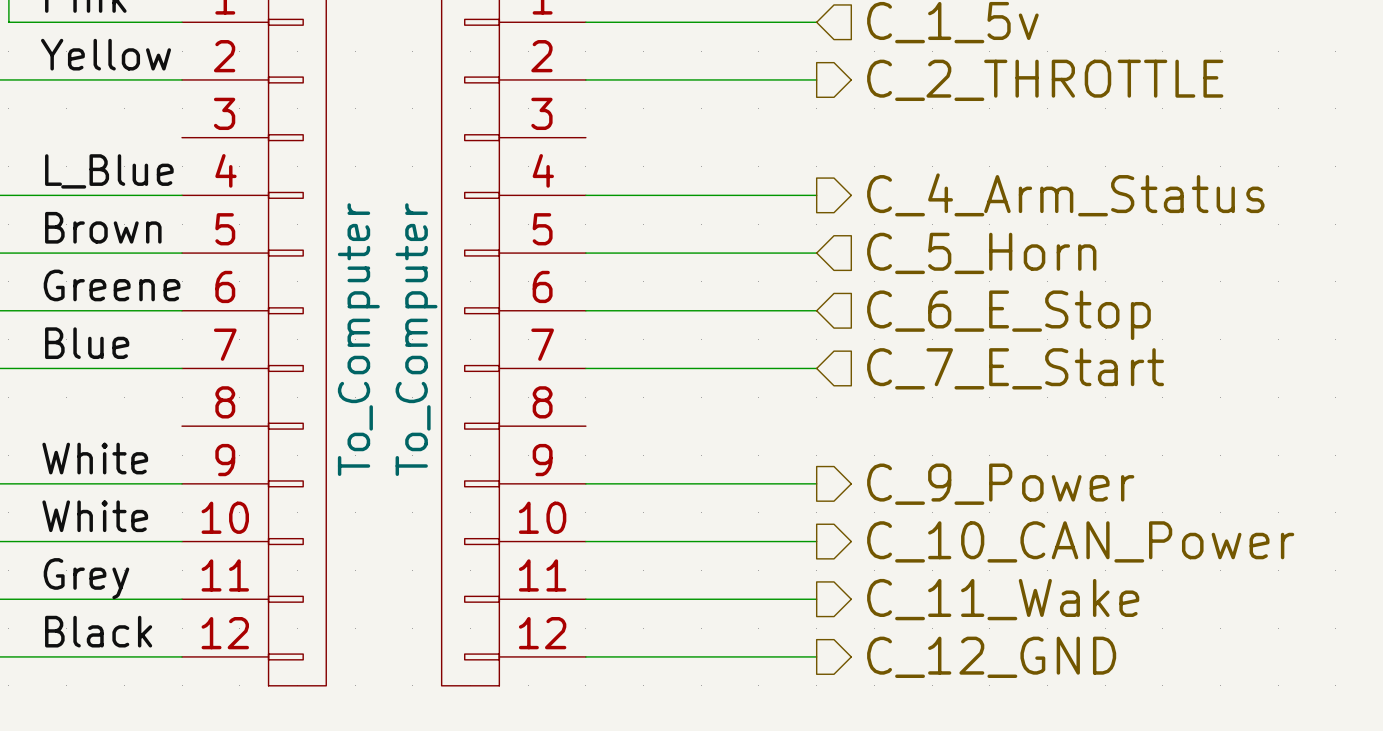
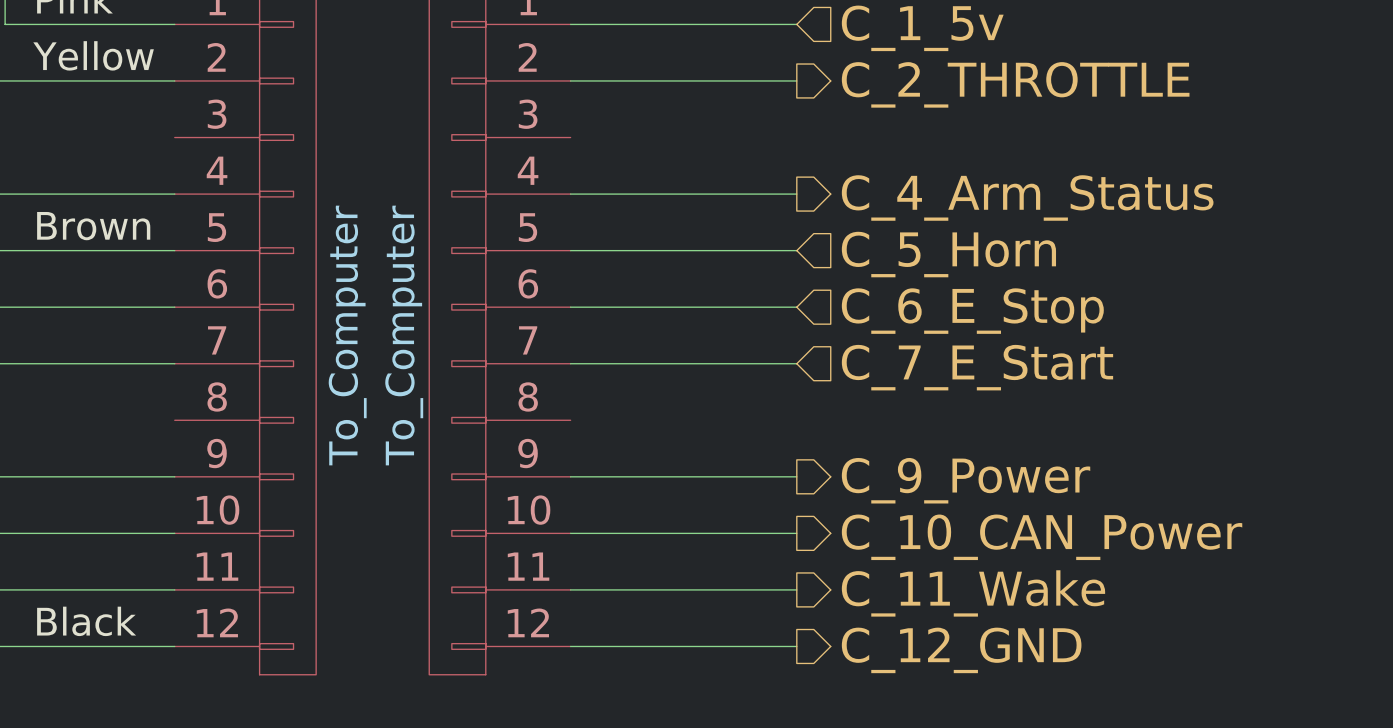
label: L_Blue (109, 171) -> none
label: Greene (112, 285) -> none
label: Blue (87, 343) -> none
label: White (95, 458) -> none
label: White (95, 516) -> none
label: Grey (86, 578) -> none

